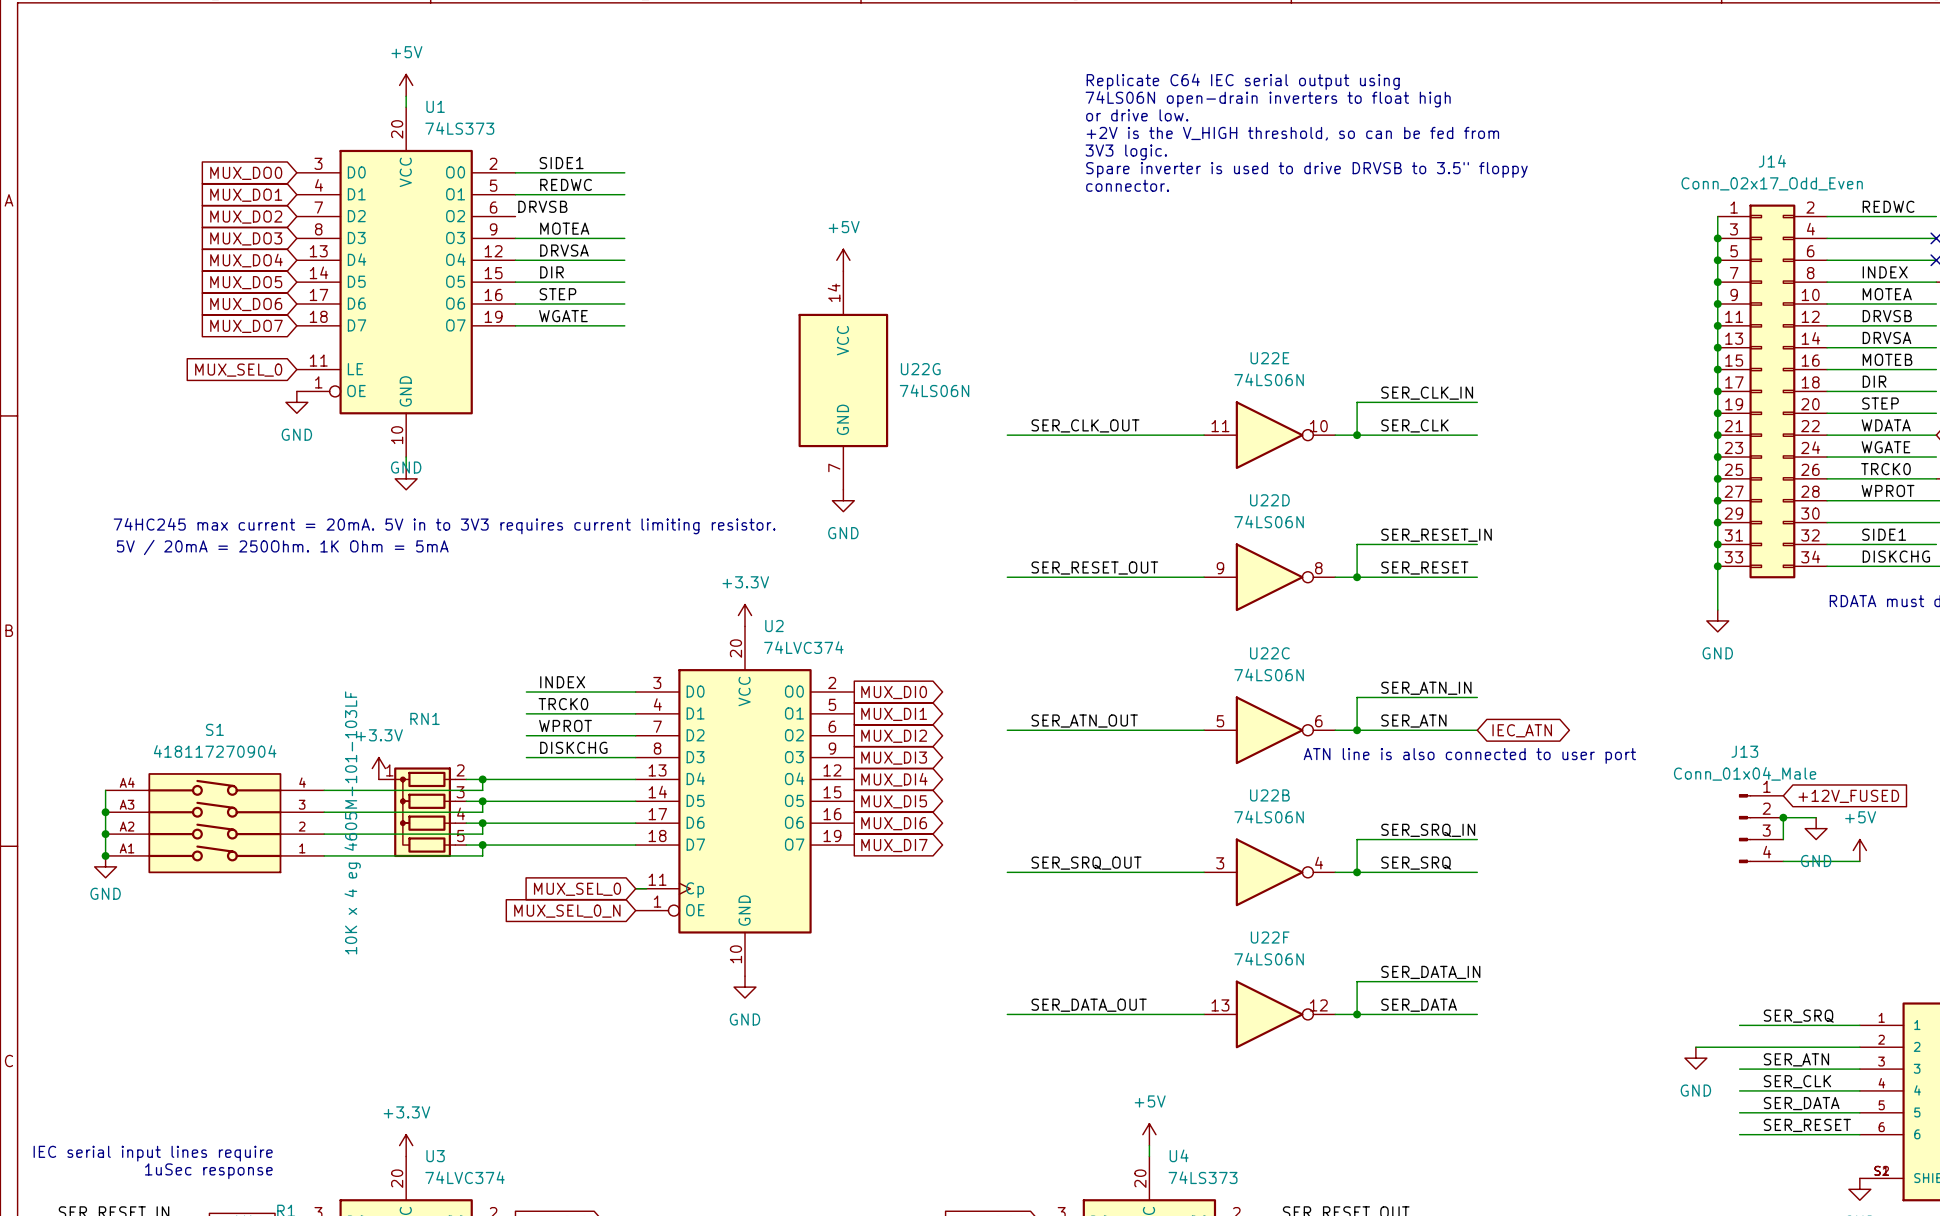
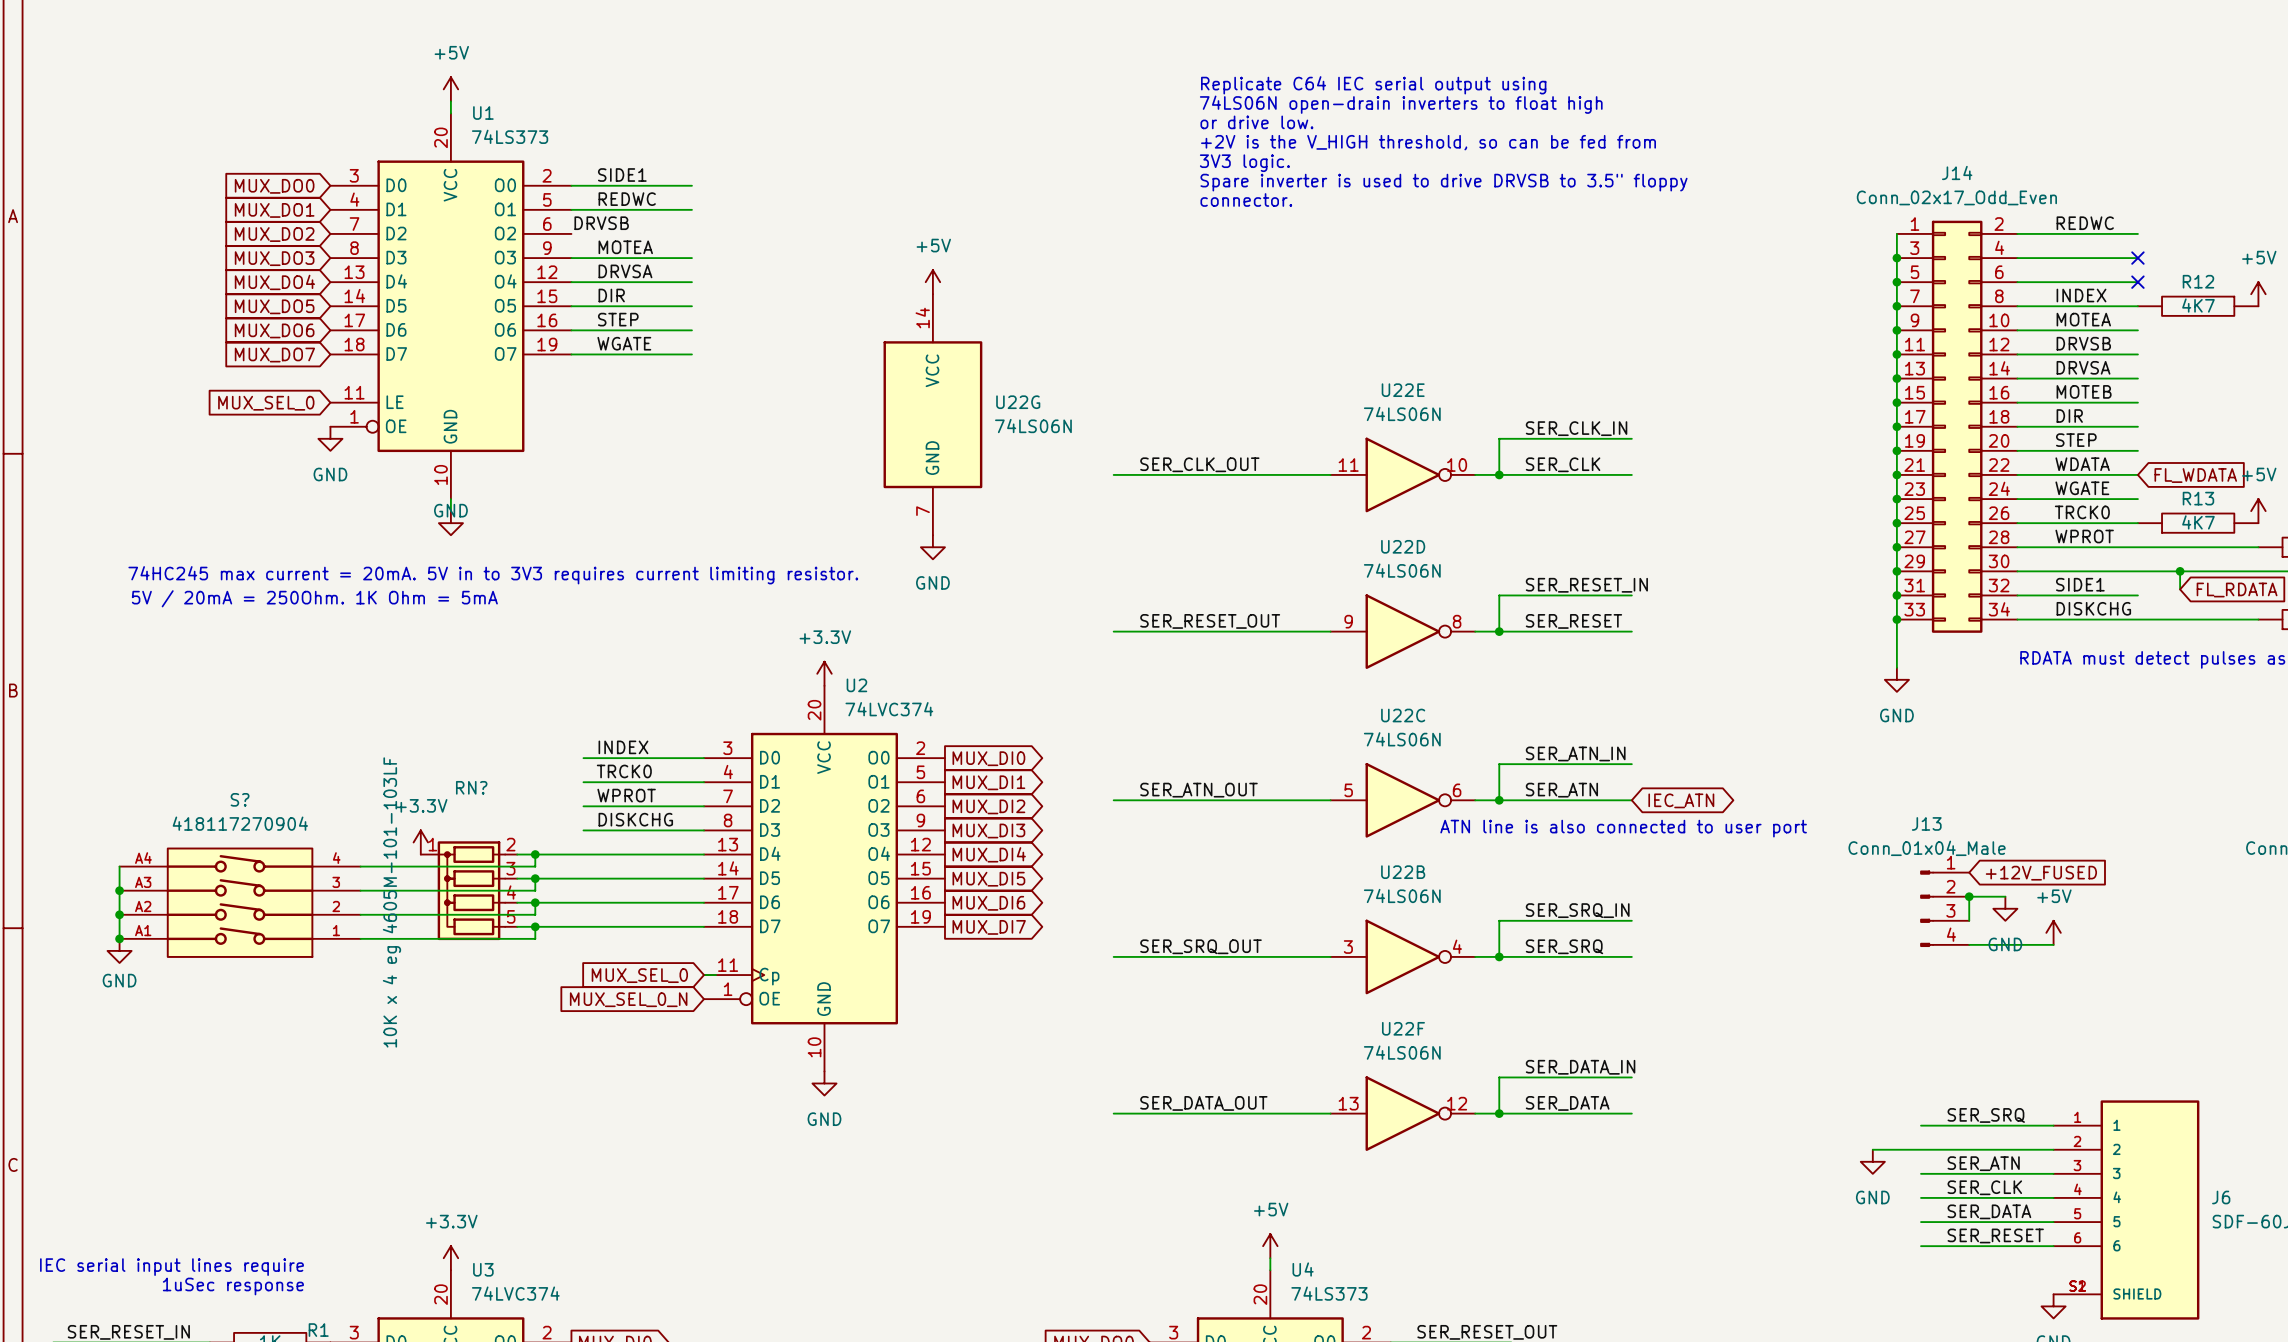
RN1 name: RN1 (425, 718) -> RN? (471, 787)
S1 name: S1 (214, 729) -> S? (240, 799)

